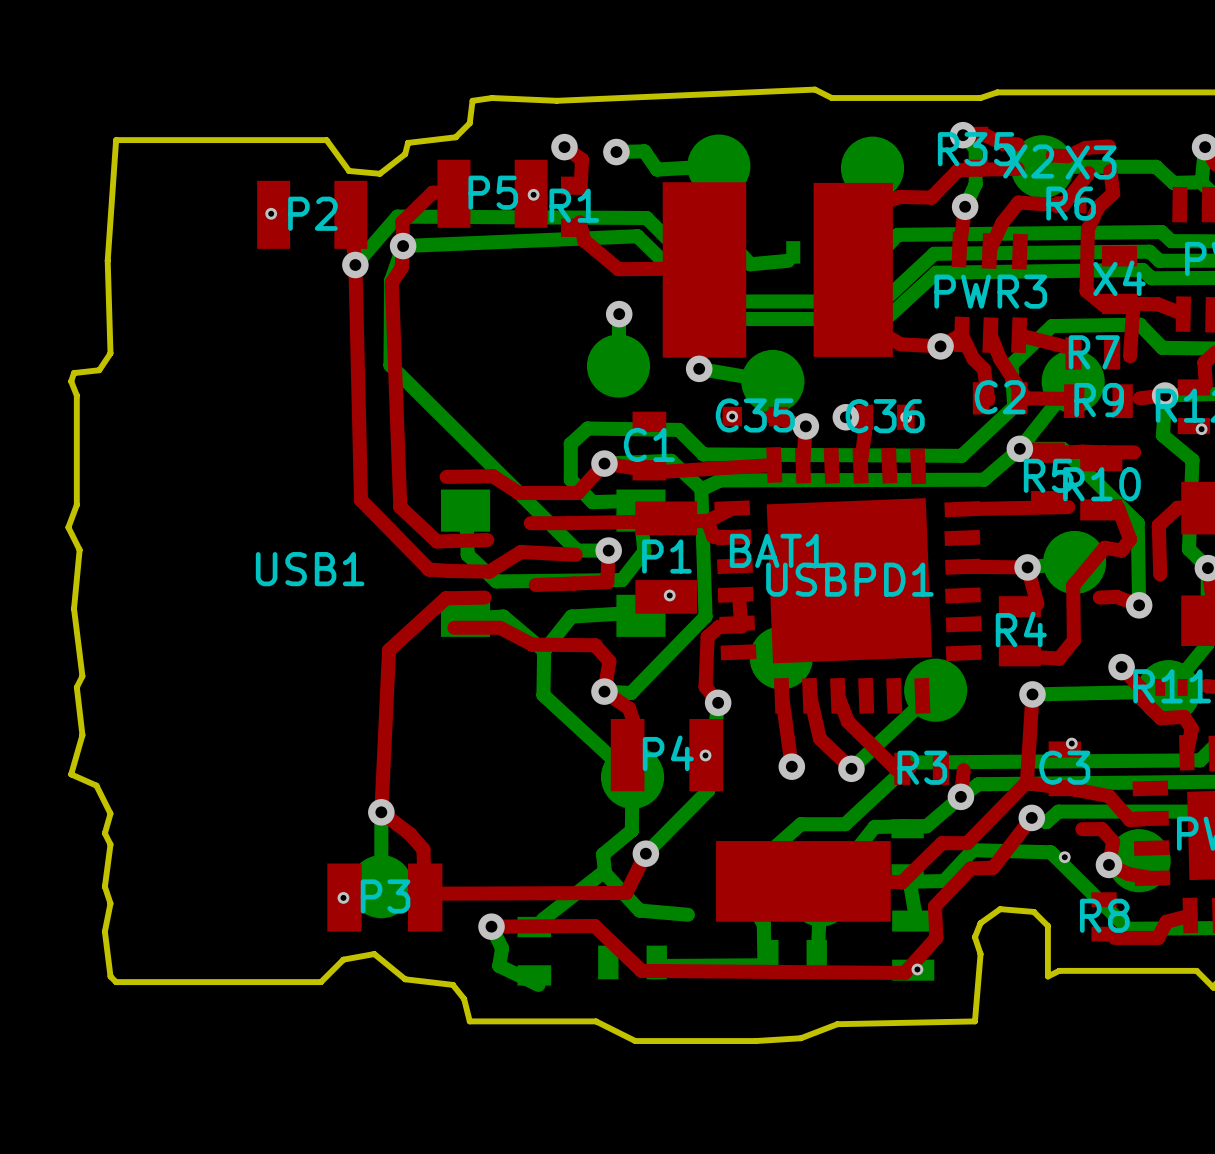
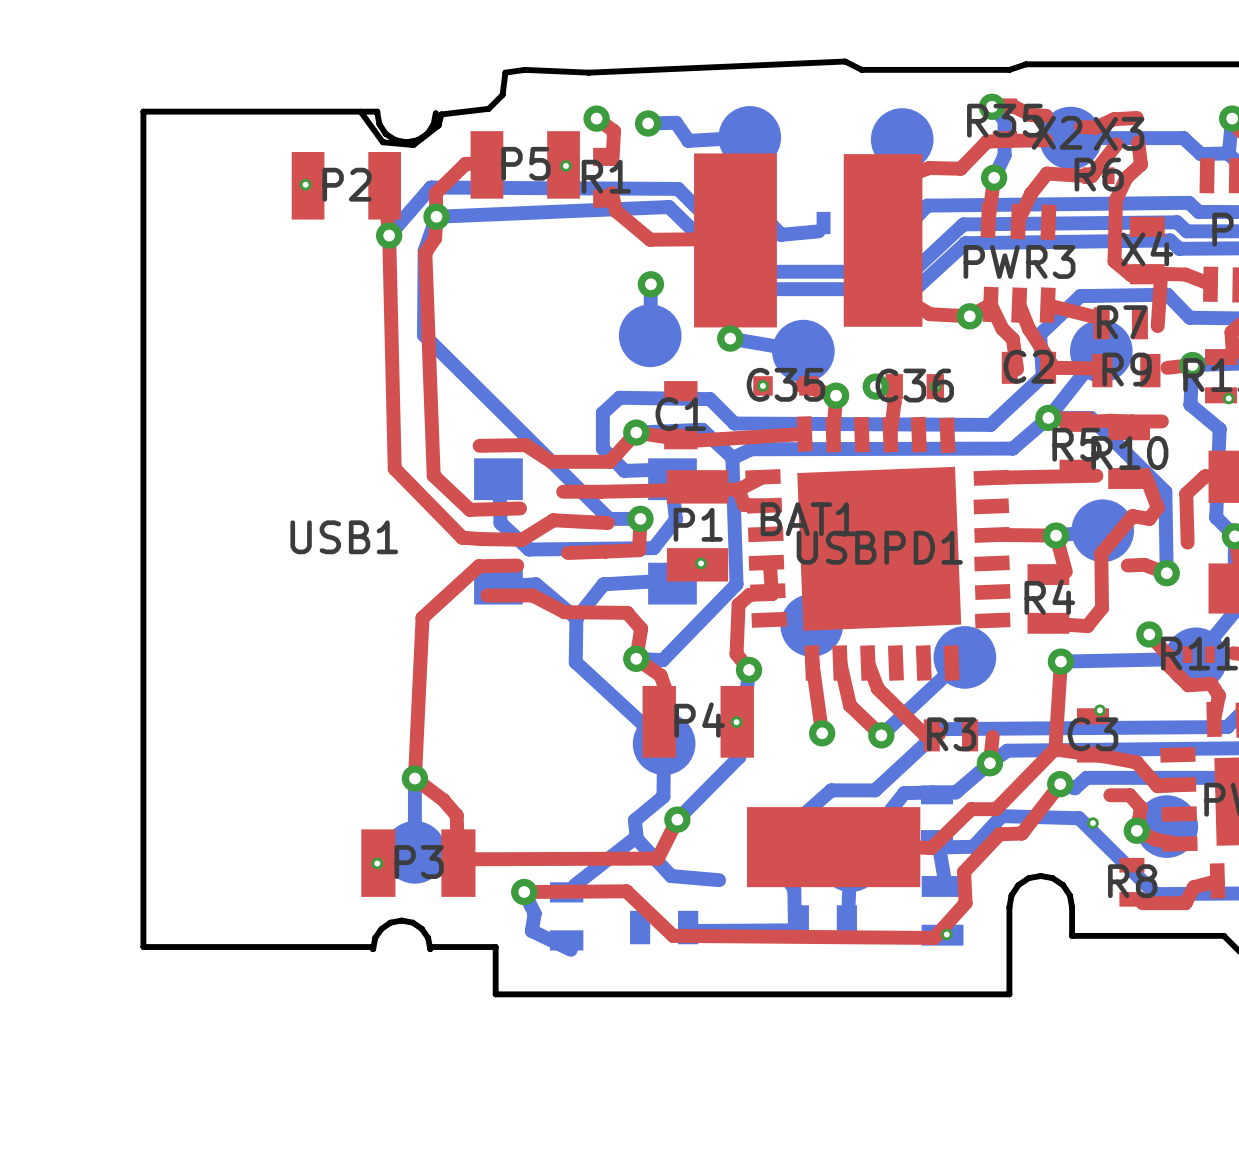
board edge: (116, 140) (107, 260) (110, 353) (99, 370) (74, 373) (71, 381) (76, 395) (76, 504) (68, 527) (79, 549) (74, 608) (82, 676) (76, 687) (82, 735) (71, 774) (96, 785) (110, 813) (104, 833) (110, 844) (104, 886) (110, 903) (104, 931) (110, 976) (116, 982) -> (151, 111) (143, 111) (143, 947) (151, 947)
board edge: none -> (360, 111) (377, 111) (379, 124) (385, 133) (395, 140) (406, 142) (417, 140) (427, 133) (433, 124) (435, 113)
board edge: (1059, 970) (1047, 976) (1047, 925) (1033, 911) (1000, 909) (980, 923) (974, 937) (980, 954) (974, 1021) (837, 1024) (800, 1038) (756, 1041) (635, 1041) (596, 1021) (469, 1021) (464, 998) (452, 984) (405, 979) (374, 954) (343, 959) (321, 982) -> (1087, 935) (1072, 935) (1069, 895) (1063, 885) (1052, 878) (1040, 876) (1028, 878) (1018, 885) (1011, 895) (1009, 907) (1009, 994) (495, 994) (495, 947) (430, 947) (430, 949) (428, 937) (421, 928) (412, 922) (401, 920) (390, 922) (381, 928) (375, 937) (373, 949) (373, 947) (355, 947)

